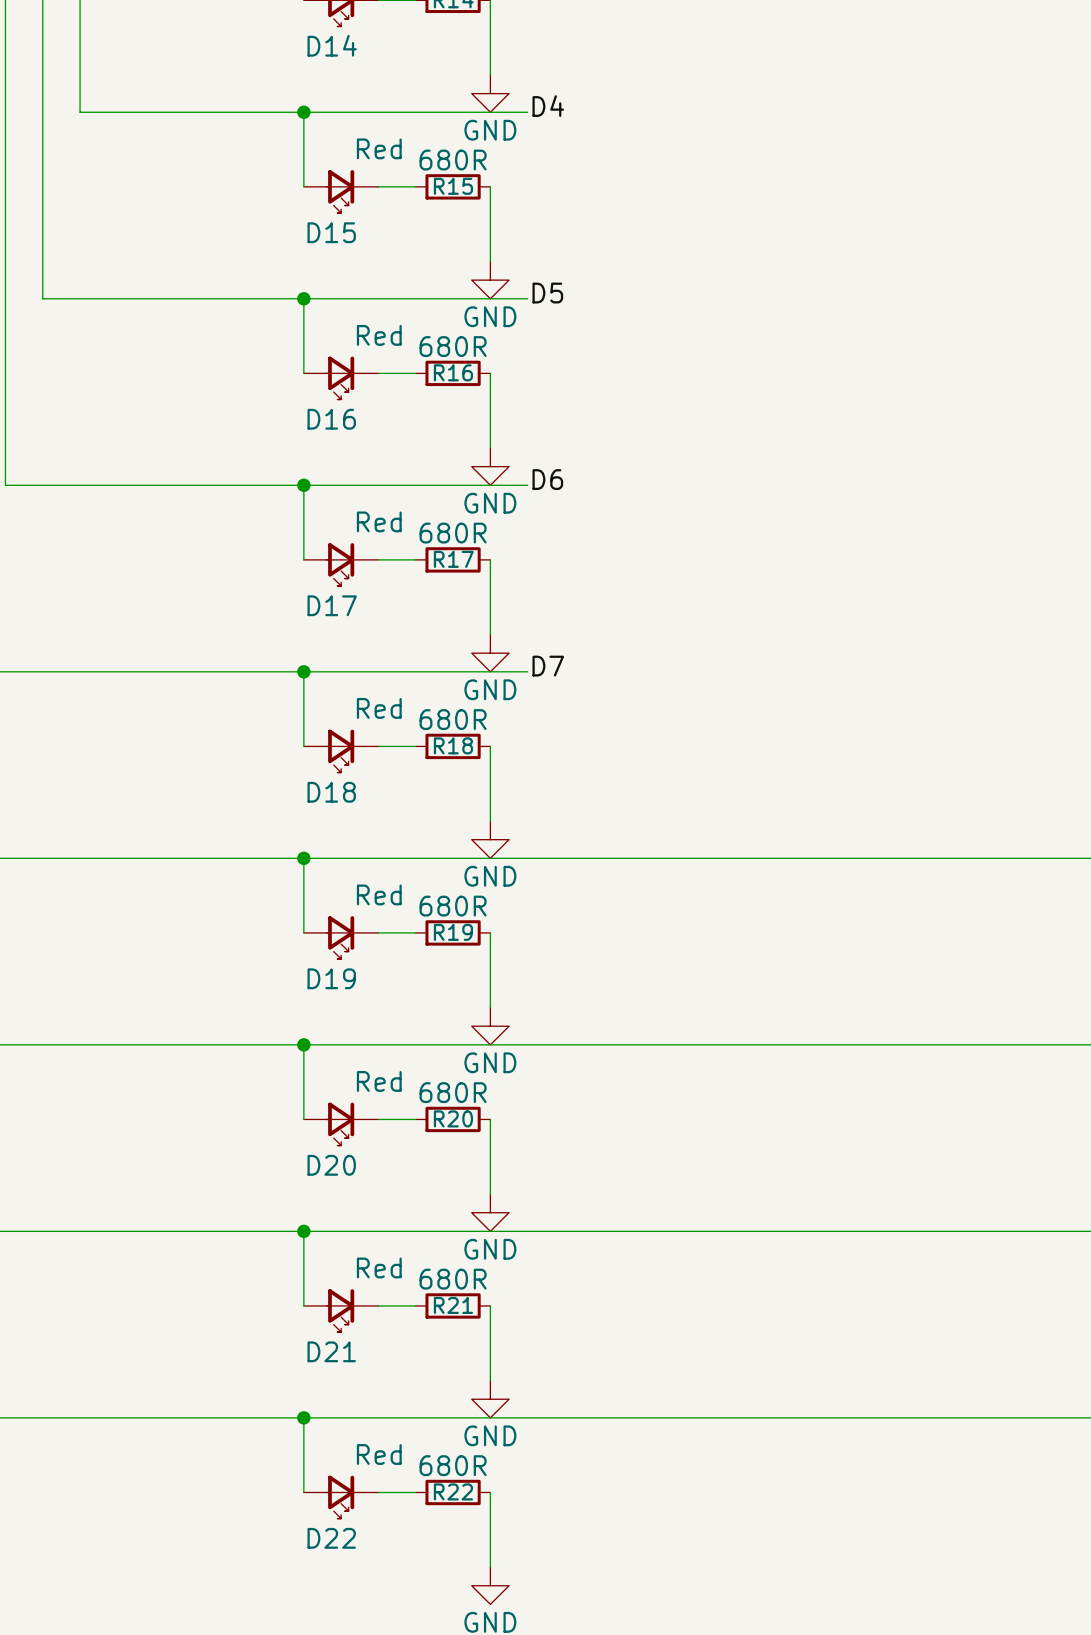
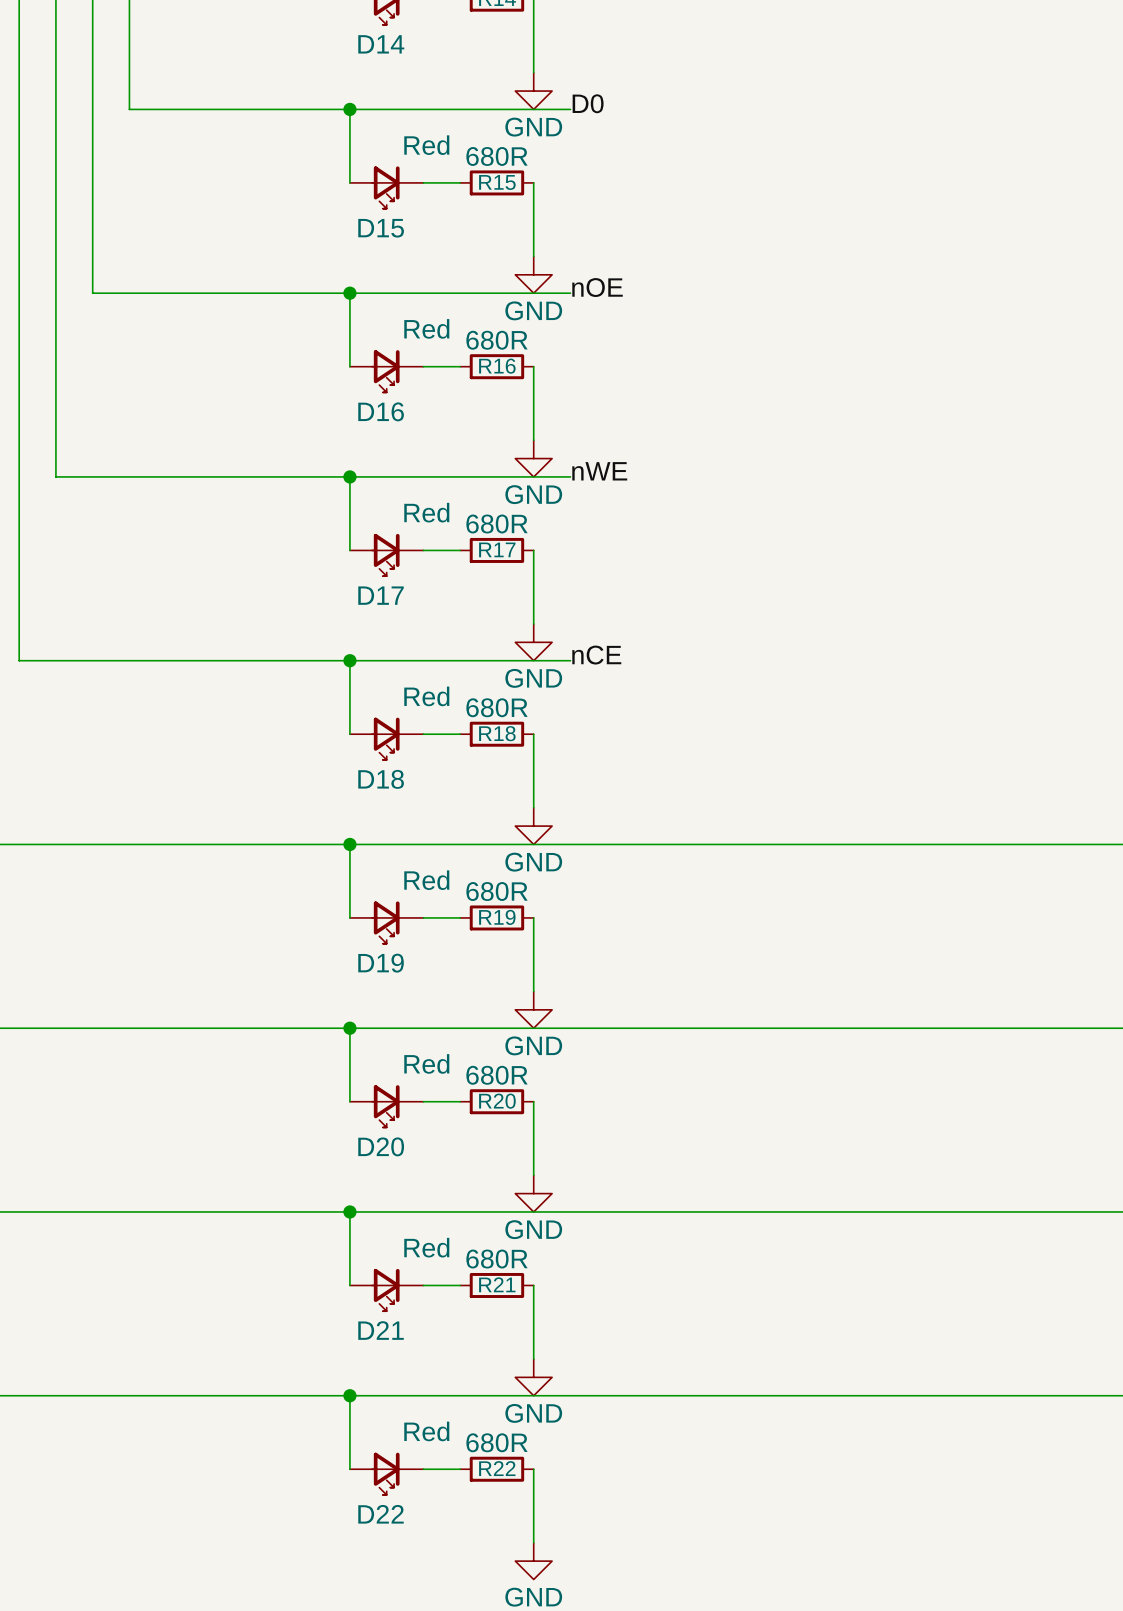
label: D4 (548, 106) -> D0 (588, 103)
label: D5 (547, 293) -> nOE (597, 287)
label: D6 (547, 479) -> nWE (599, 471)
label: D7 (548, 666) -> nCE (596, 655)

